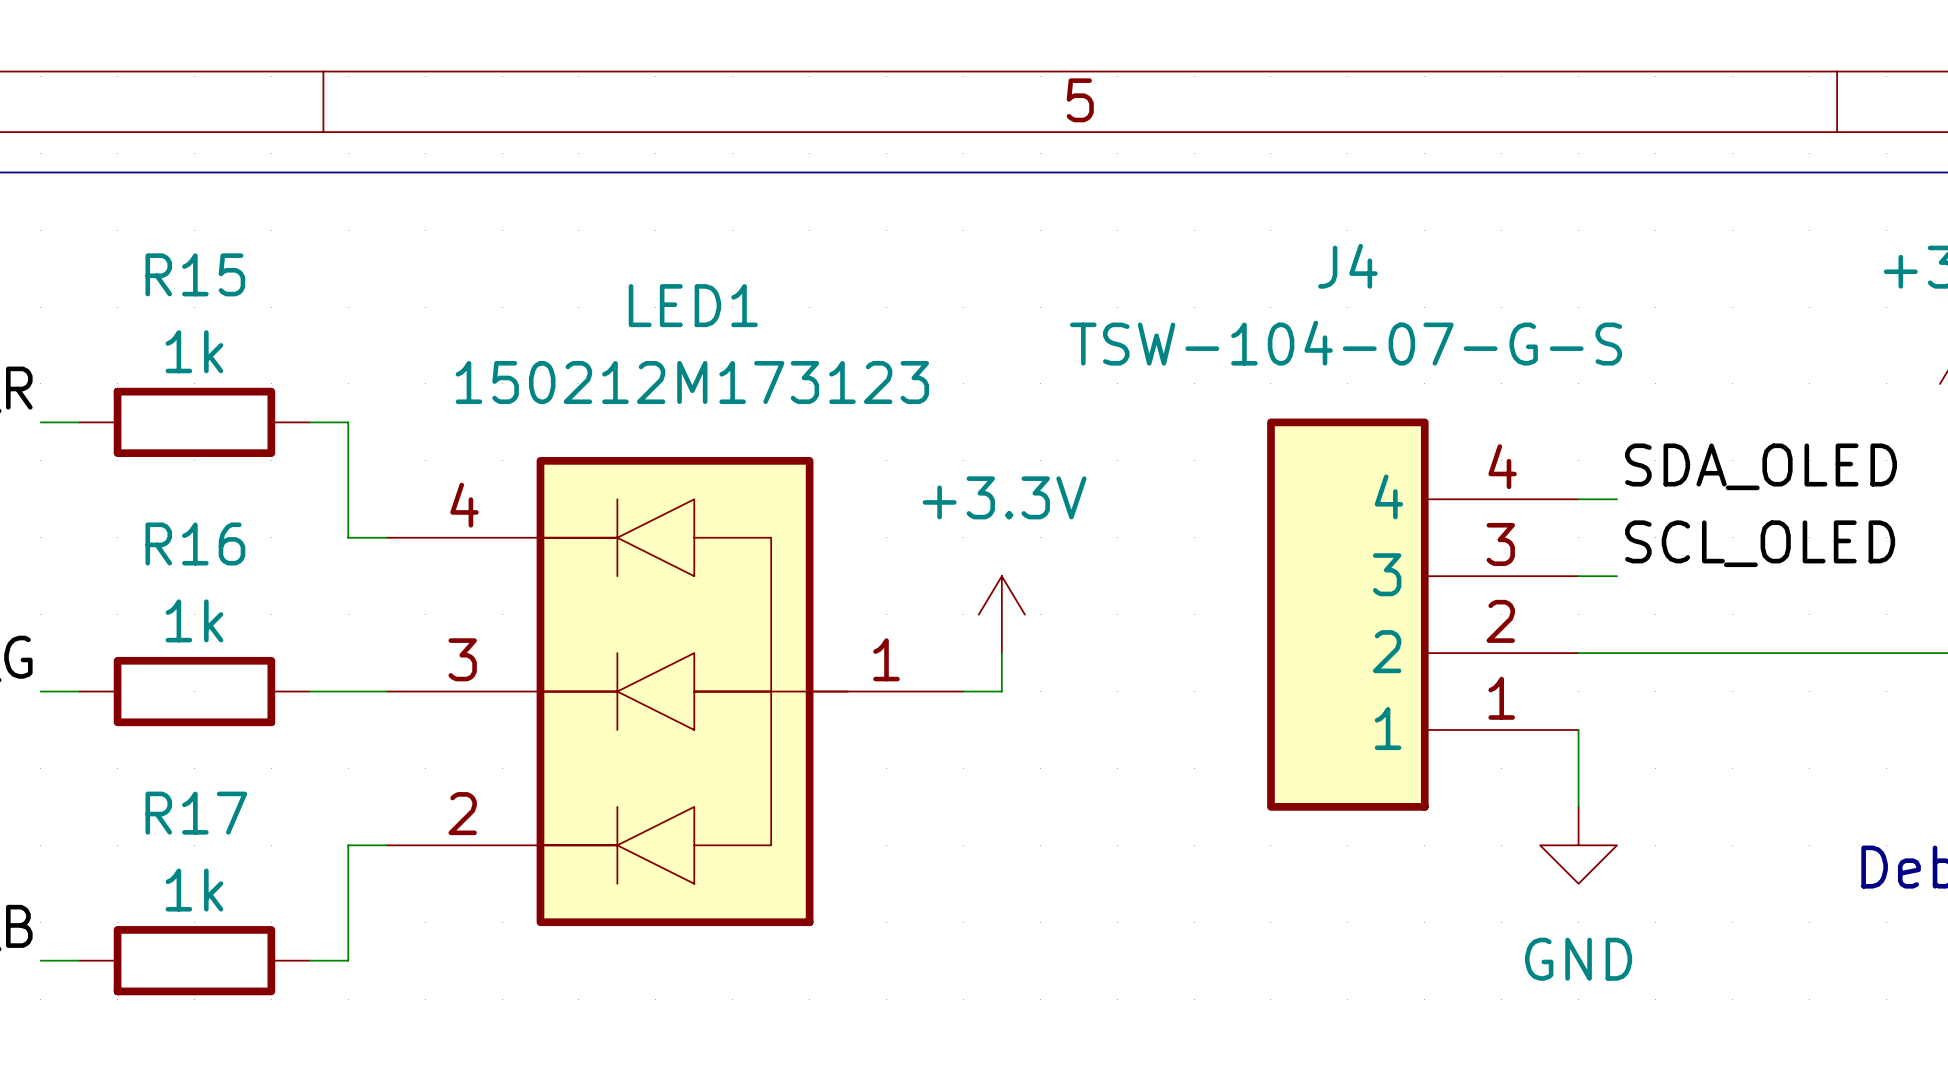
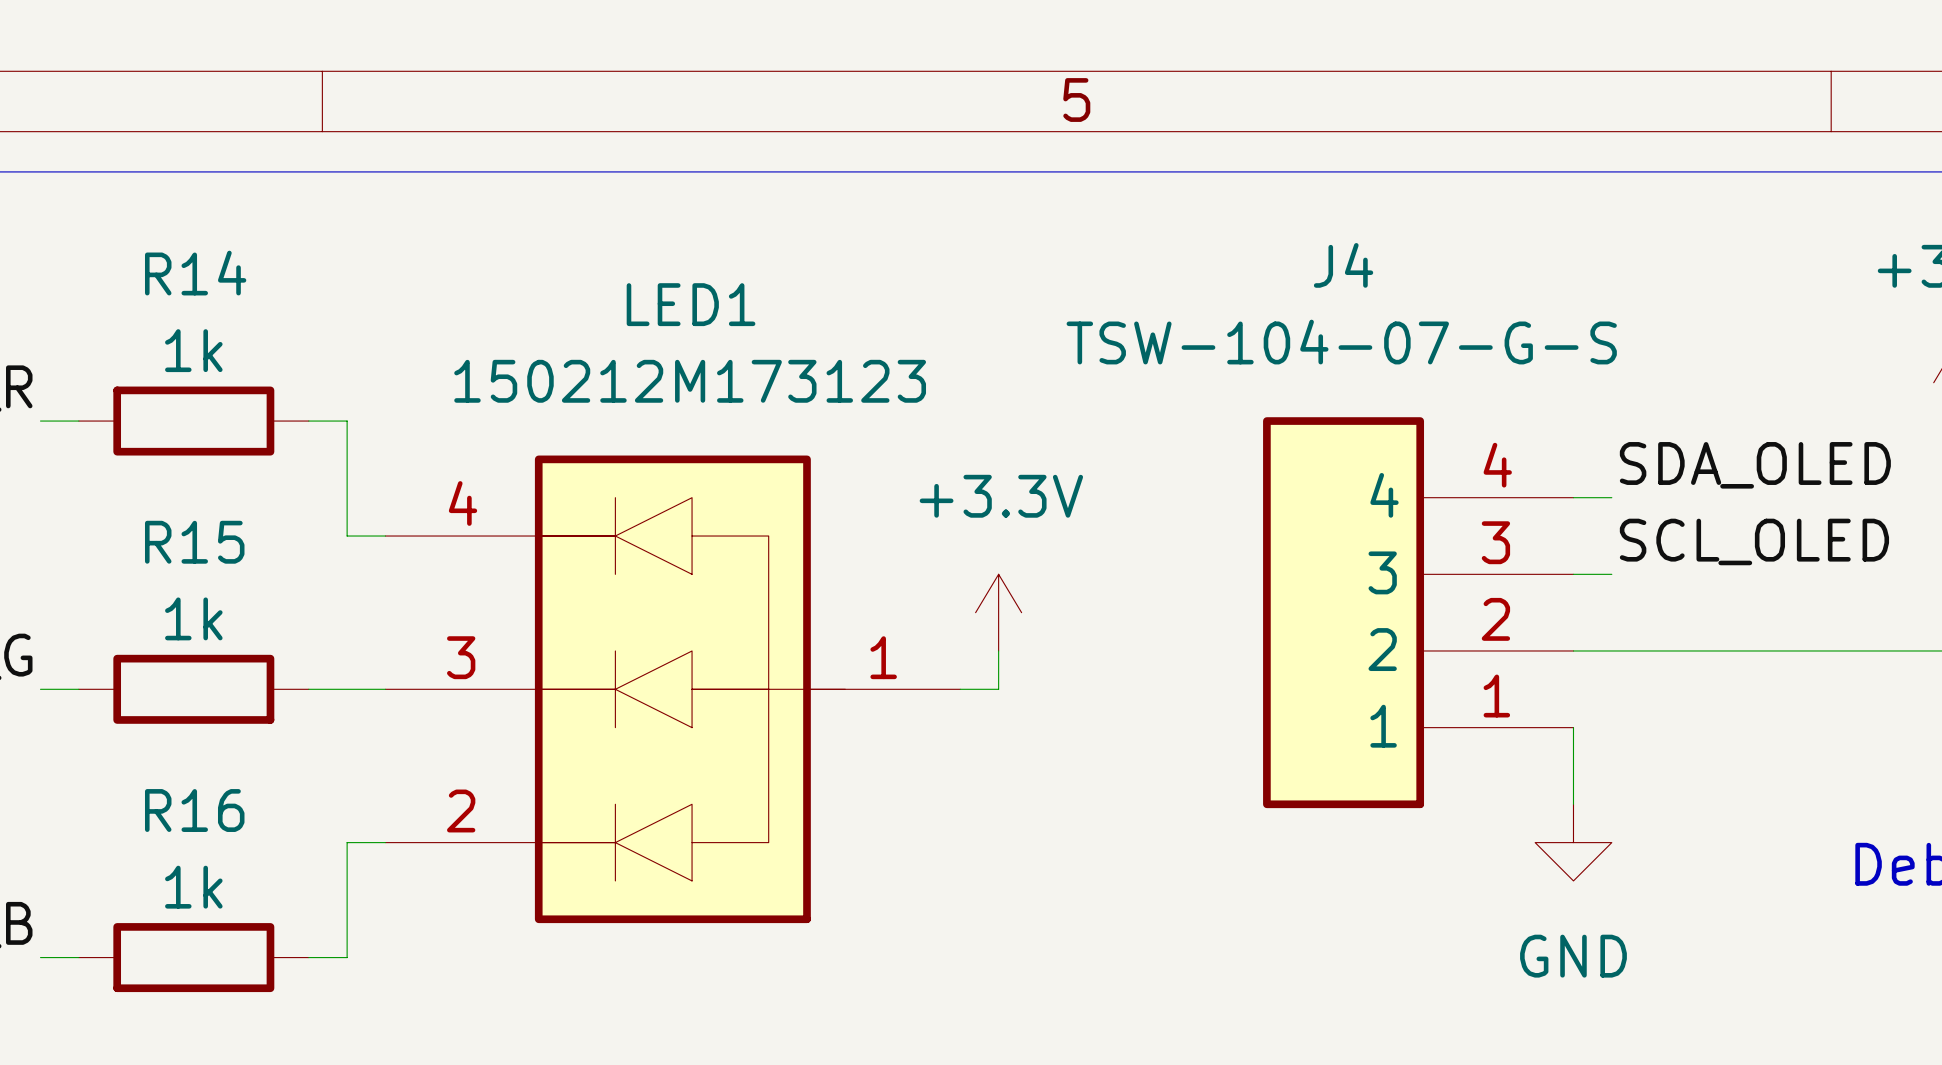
R15 name: R15 (195, 274) -> R14 (195, 273)
R16 name: R16 (195, 544) -> R15 (194, 542)
R17 name: R17 (196, 813) -> R16 (194, 810)

